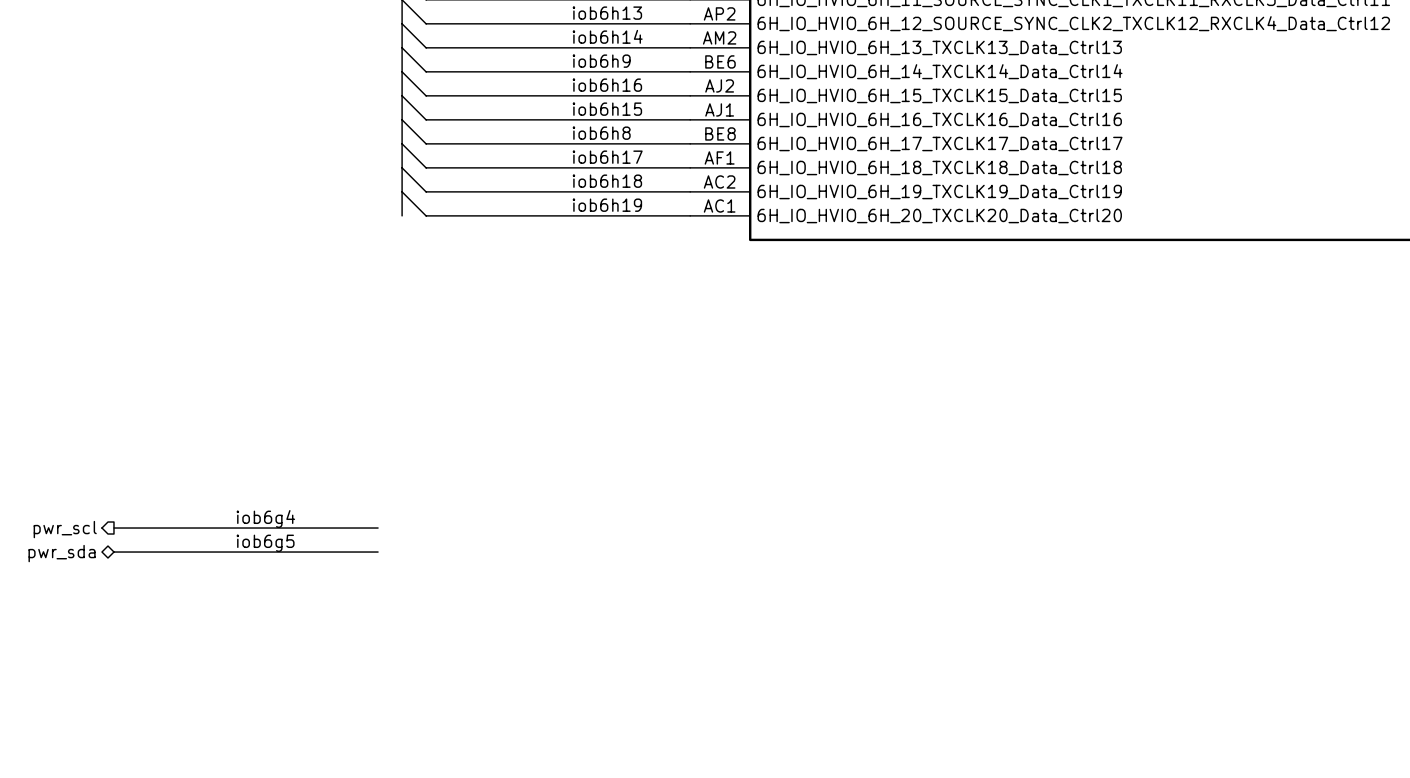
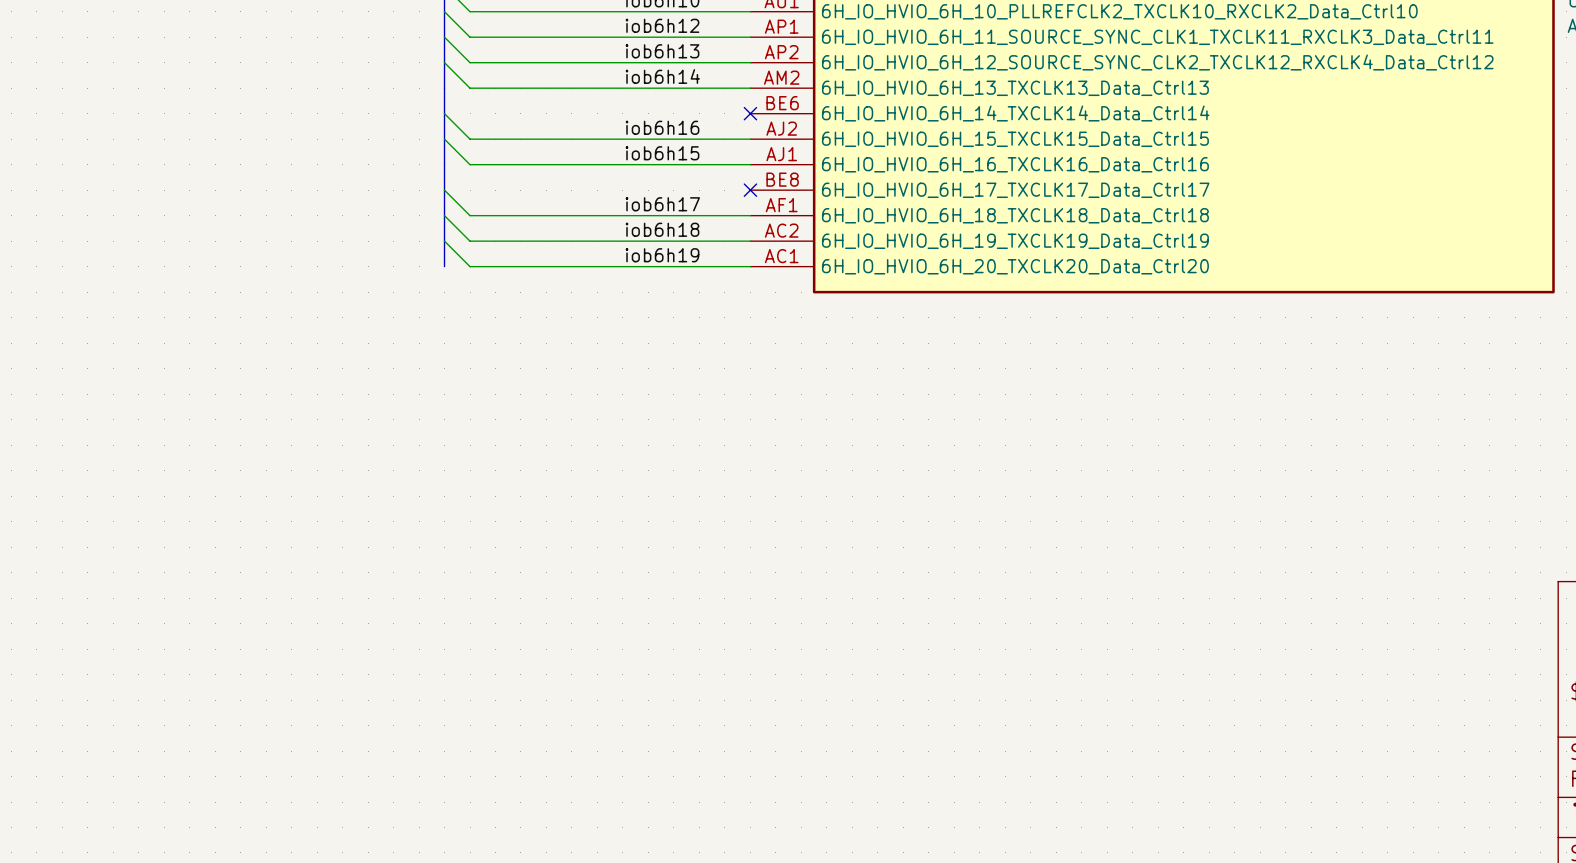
wire: (402, 47) (426, 71) (690, 71) -> none
label: iob6h9 (601, 61) -> none
no-connect mark: none -> (750, 113)
wire: (402, 119) (426, 143) (690, 143) -> none
label: iob6h8 (601, 133) -> none
no-connect mark: none -> (750, 190)
label: iob6g4 (265, 519) -> none
wire: (113, 528) (378, 528) -> none
hierarchical label: pwr_scl (65, 529) -> none
label: iob6g5 (265, 543) -> none
wire: (113, 552) (378, 552) -> none
hierarchical label: pwr_sda (62, 553) -> none

